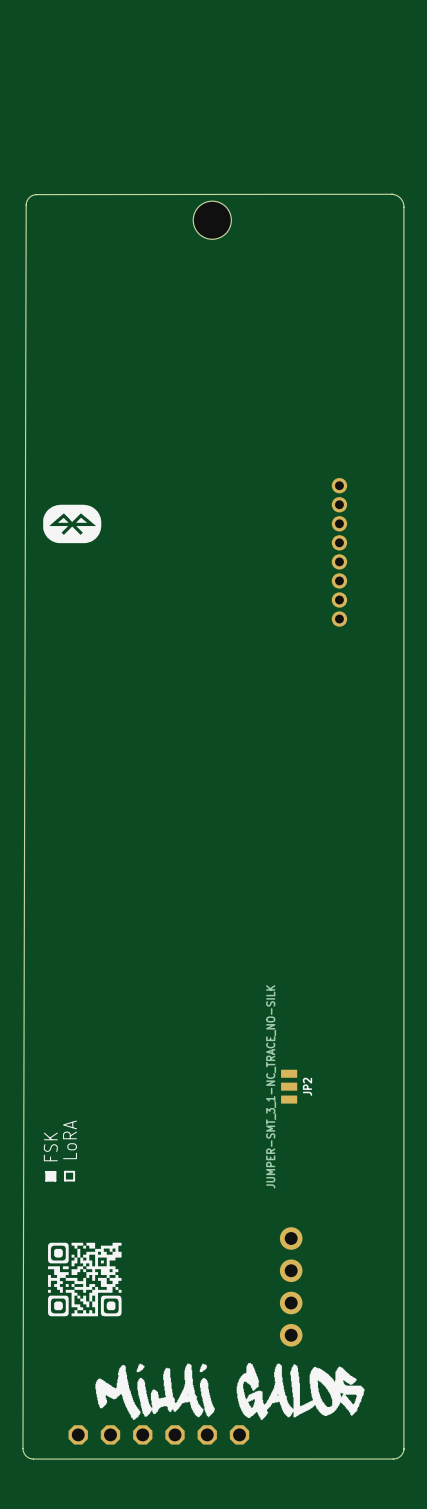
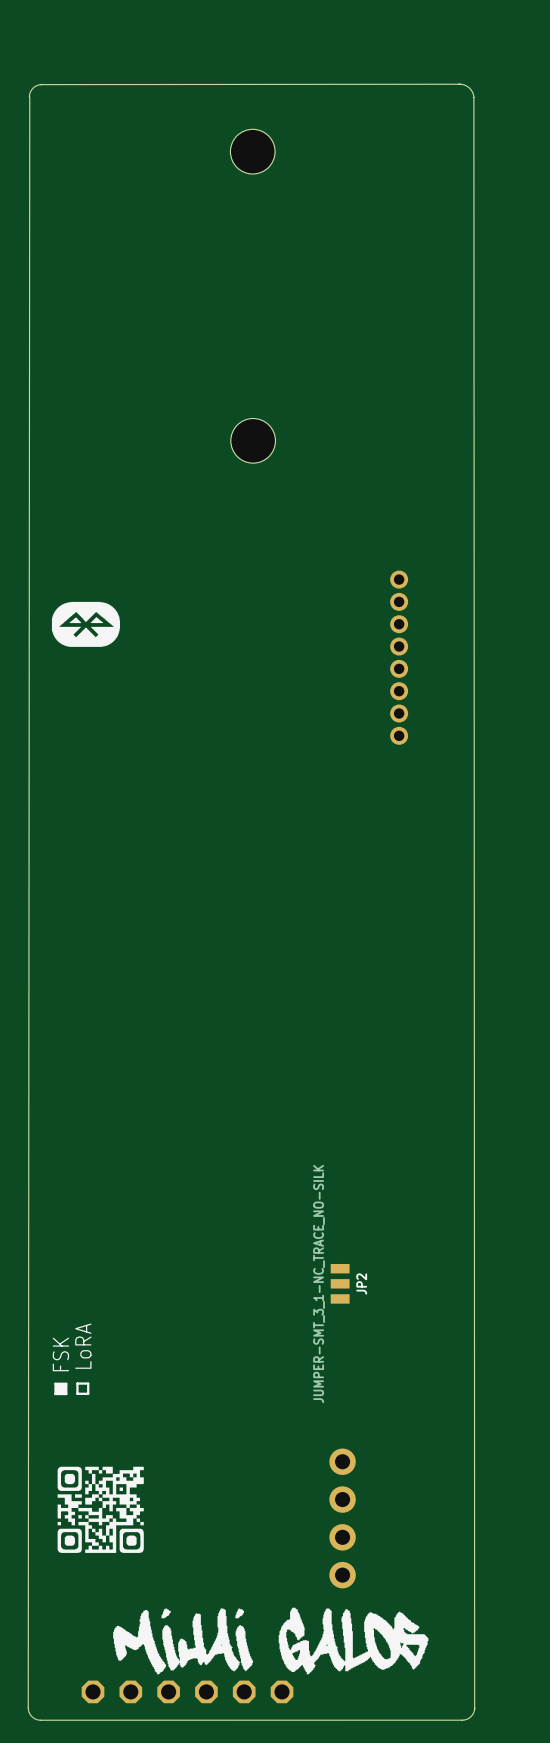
board edge: none -> (460, 84) (40, 84)
hole: none -> (252, 151)
board edge: (36, 194) (29, 197) (26, 205) -> (41, 84) (33, 88) (29, 96)
board edge: (391, 194) (400, 198) (403, 207) -> (458, 84) (469, 87) (473, 97)
board edge: (392, 194) (35, 194) -> none
board edge: (26, 204) (22, 1448) -> (29, 96) (28, 1707)
board edge: (403, 207) (403, 1449) -> (473, 97) (474, 1709)
hole: (212, 220) -> none
hole: none -> (253, 440)

